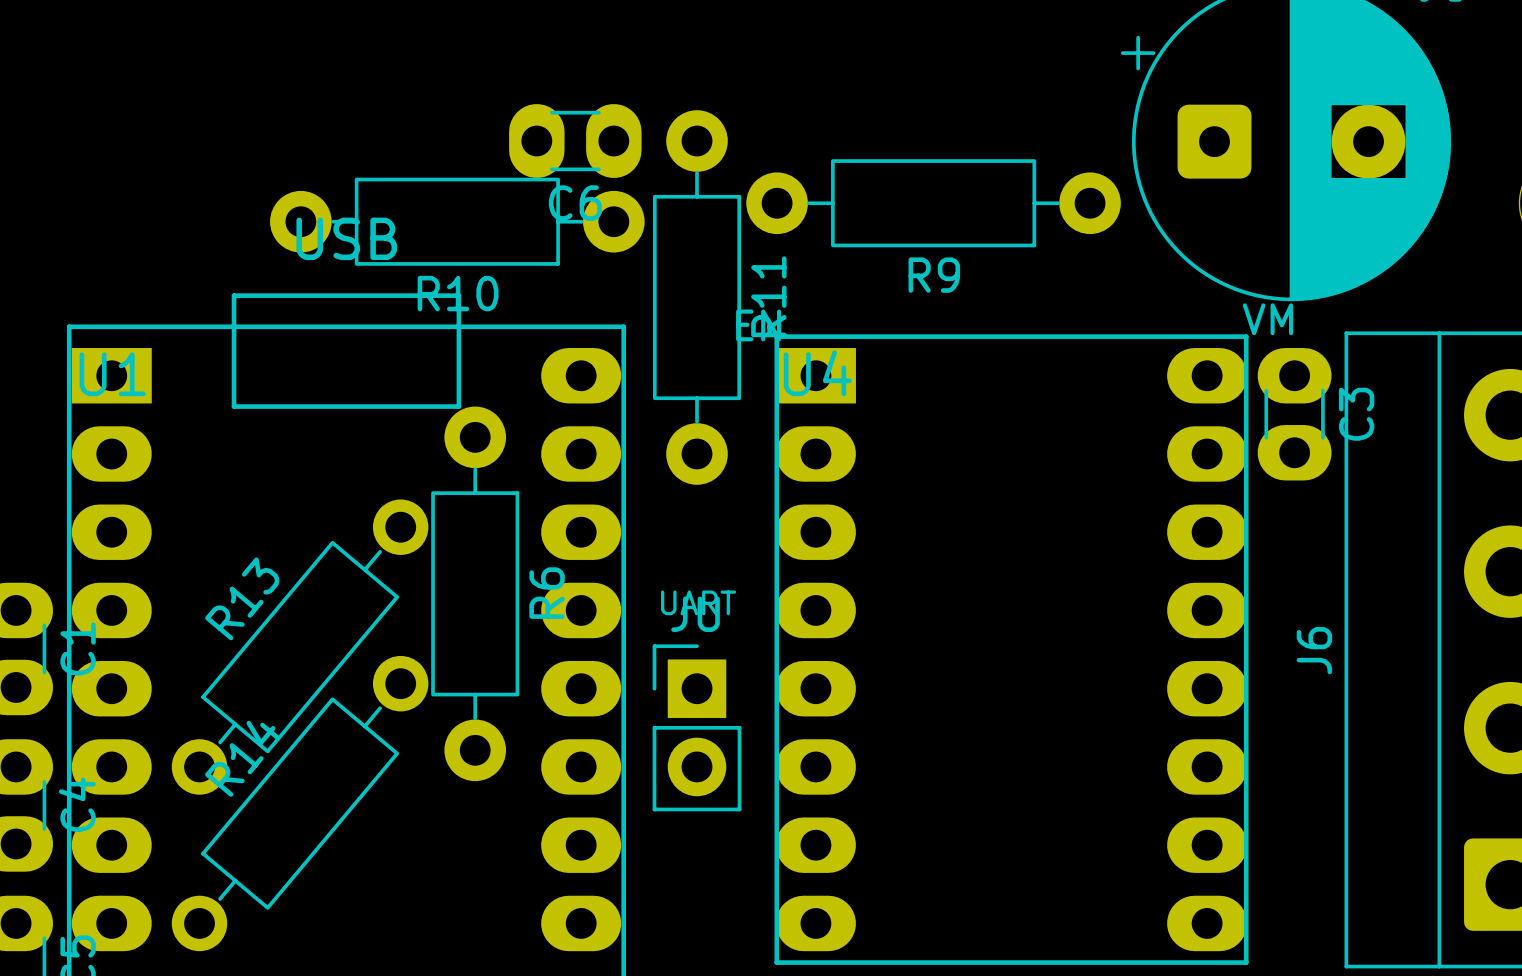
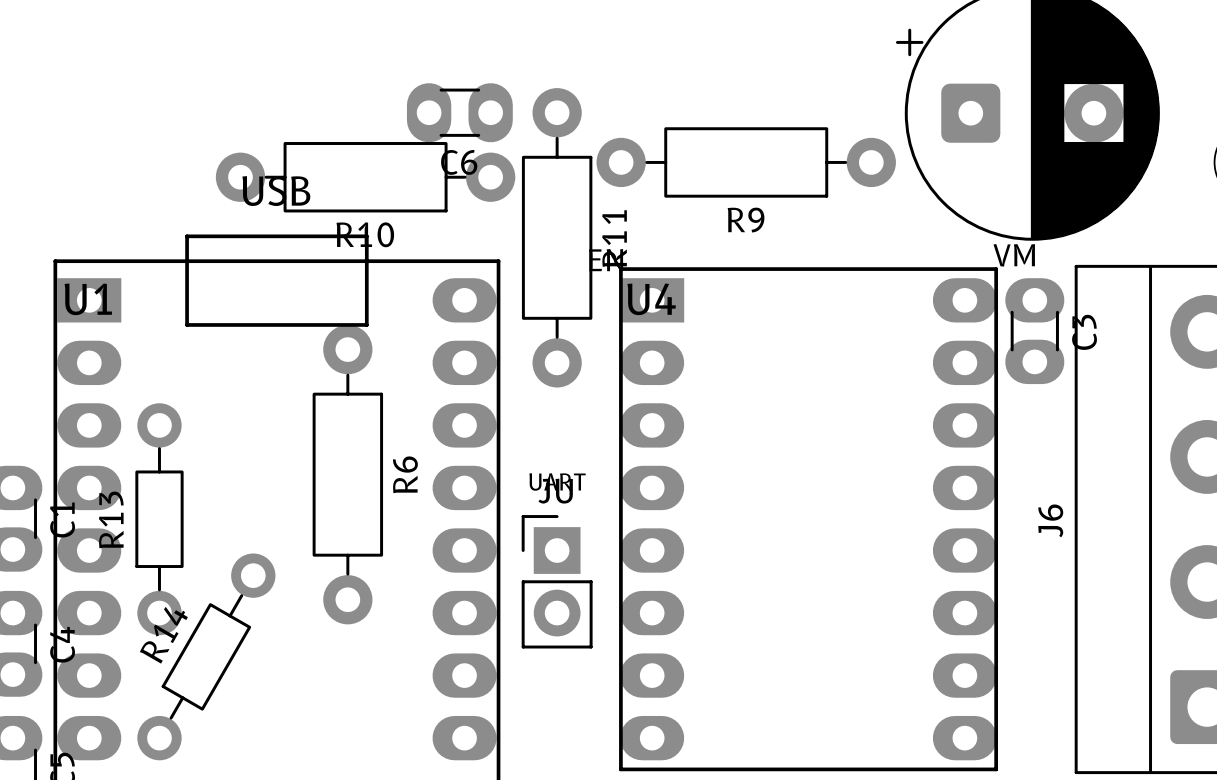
R13 footprint: [171, 499, 429, 795] -> [135, 403, 184, 636]
R6 position: (475, 593) -> (347, 474)
R14 footprint: [171, 655, 429, 952] -> [137, 553, 276, 761]

